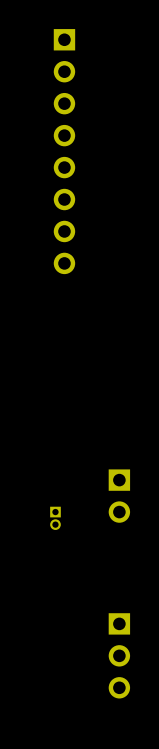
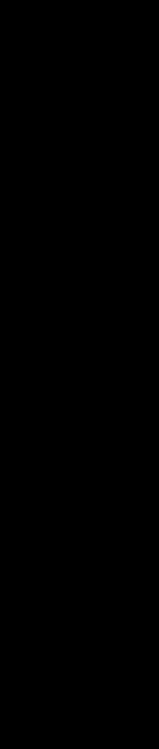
part: (64, 151) -> none
part: (119, 496) -> none
part: (55, 518) -> none
part: (119, 655) -> none

